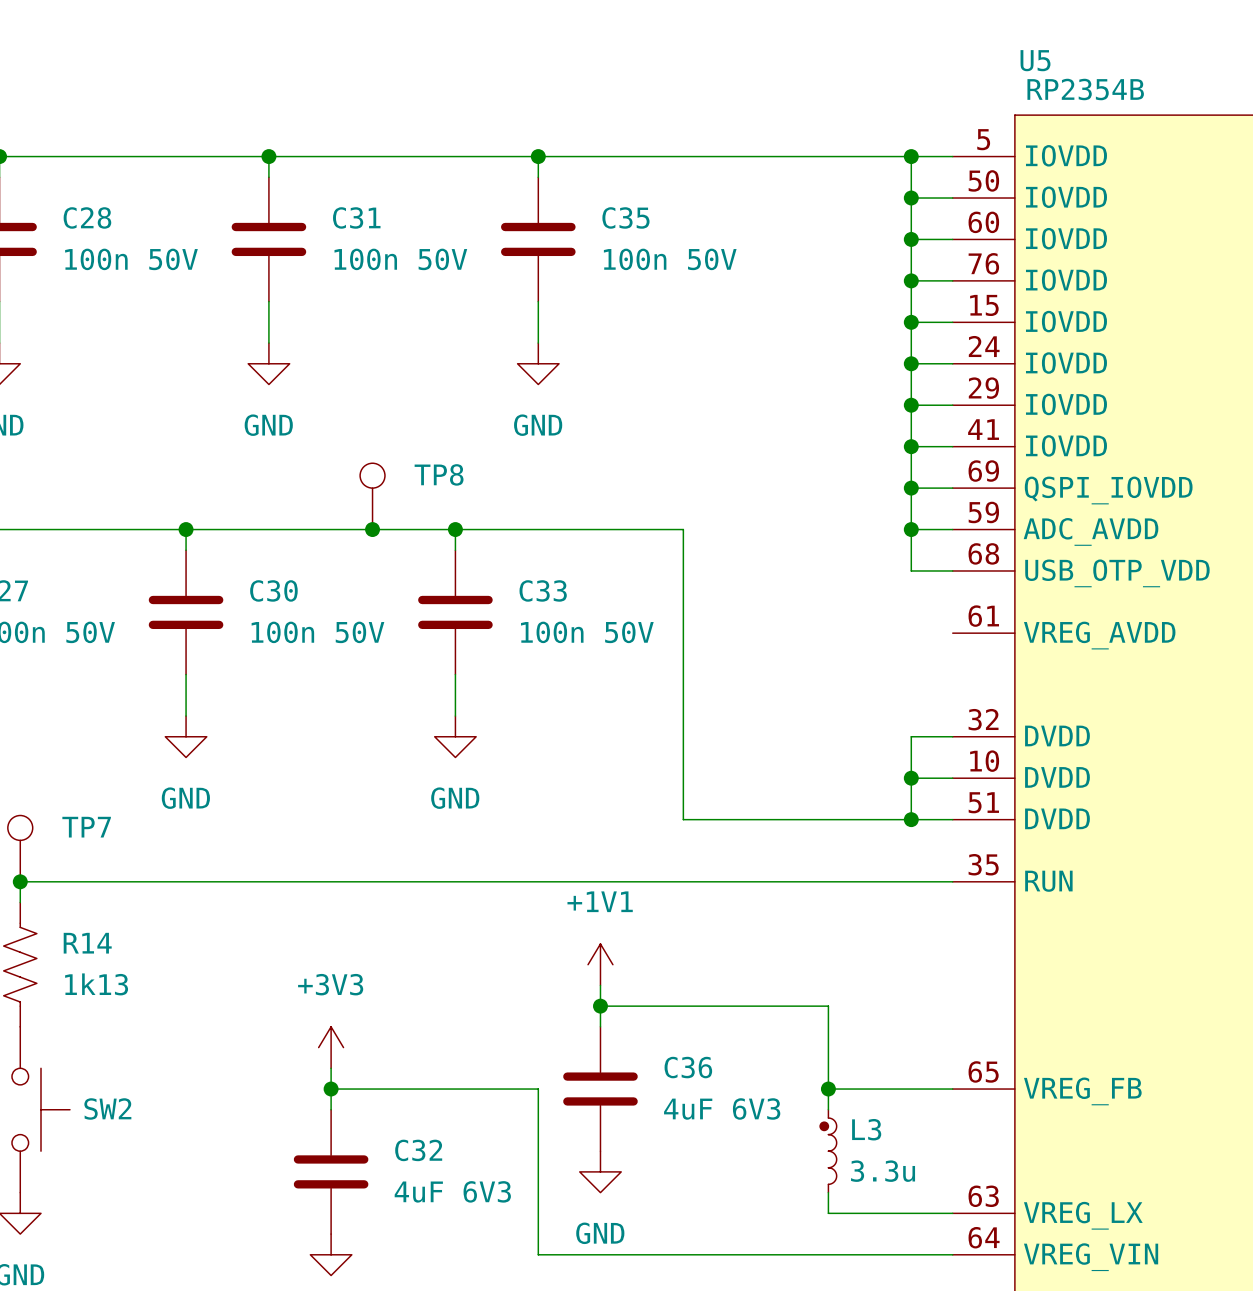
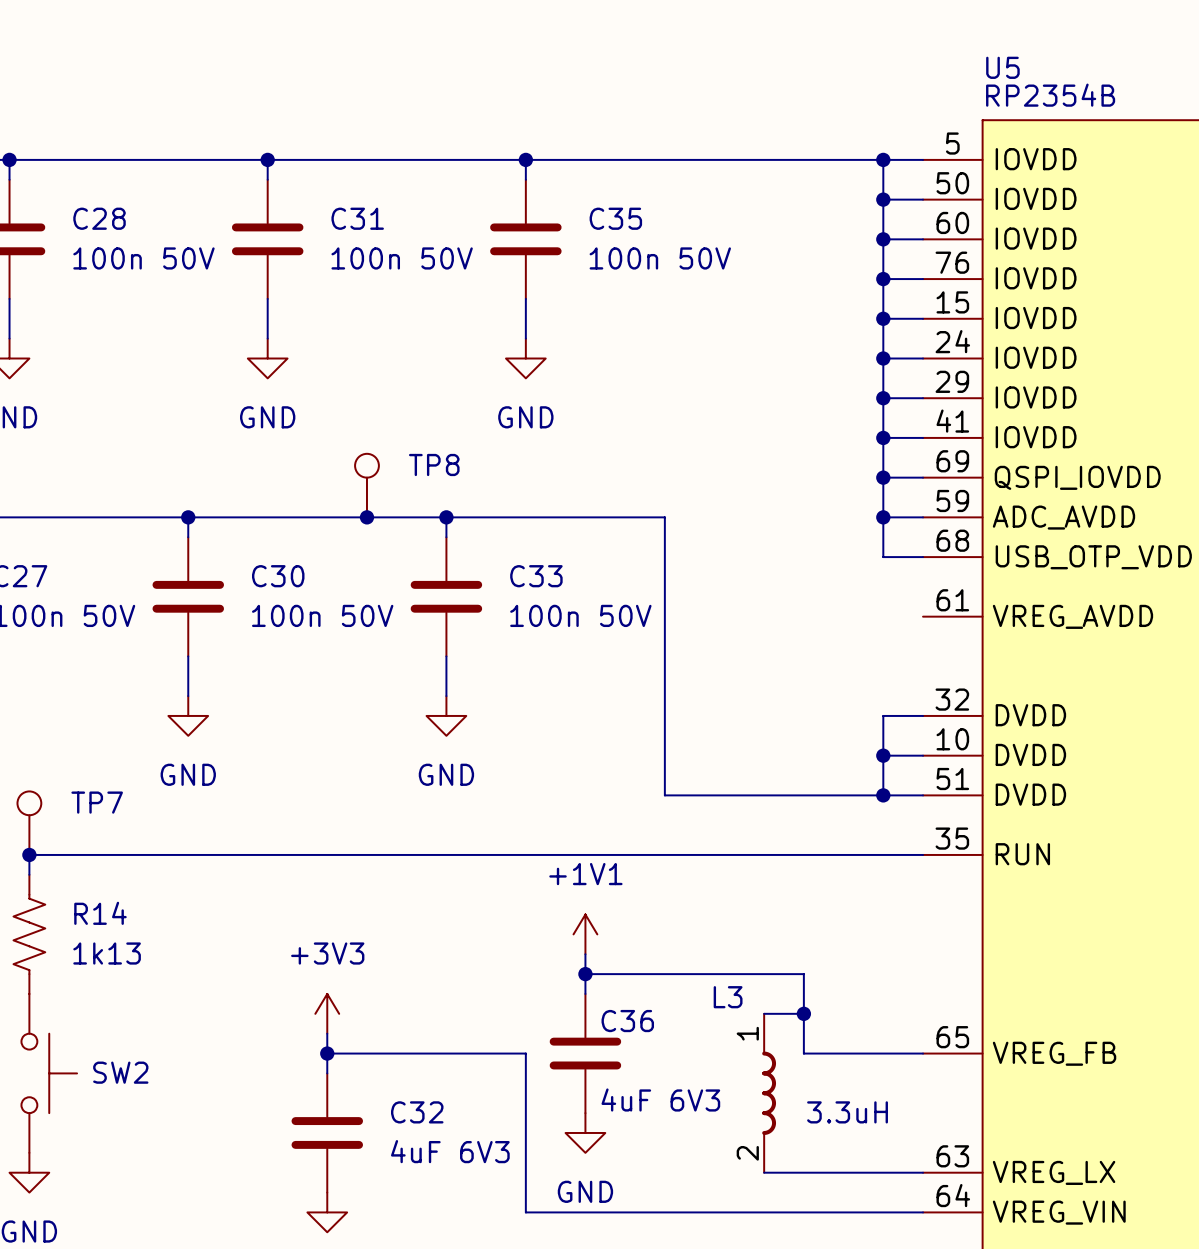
wire: none -> (764, 1013) (803, 1013)
C36 name position: C36 (688, 1067) -> C36 (627, 1021)
wire: (828, 1089) (828, 1109) -> none
junction position: (828, 1089) -> (803, 1013)
C36 value position: 4uF 6V3 (722, 1108) -> 4uF 6V3 (660, 1100)
L3 symbol: [820, 1109, 837, 1193] -> [762, 1013, 777, 1173]
L3 name position: L3 (866, 1129) -> L3 (728, 997)
L3 value: 3.3u (883, 1171) -> 3.3uH (847, 1112)
wire: (828, 1192) (828, 1213) -> (764, 1172) (803, 1172)

